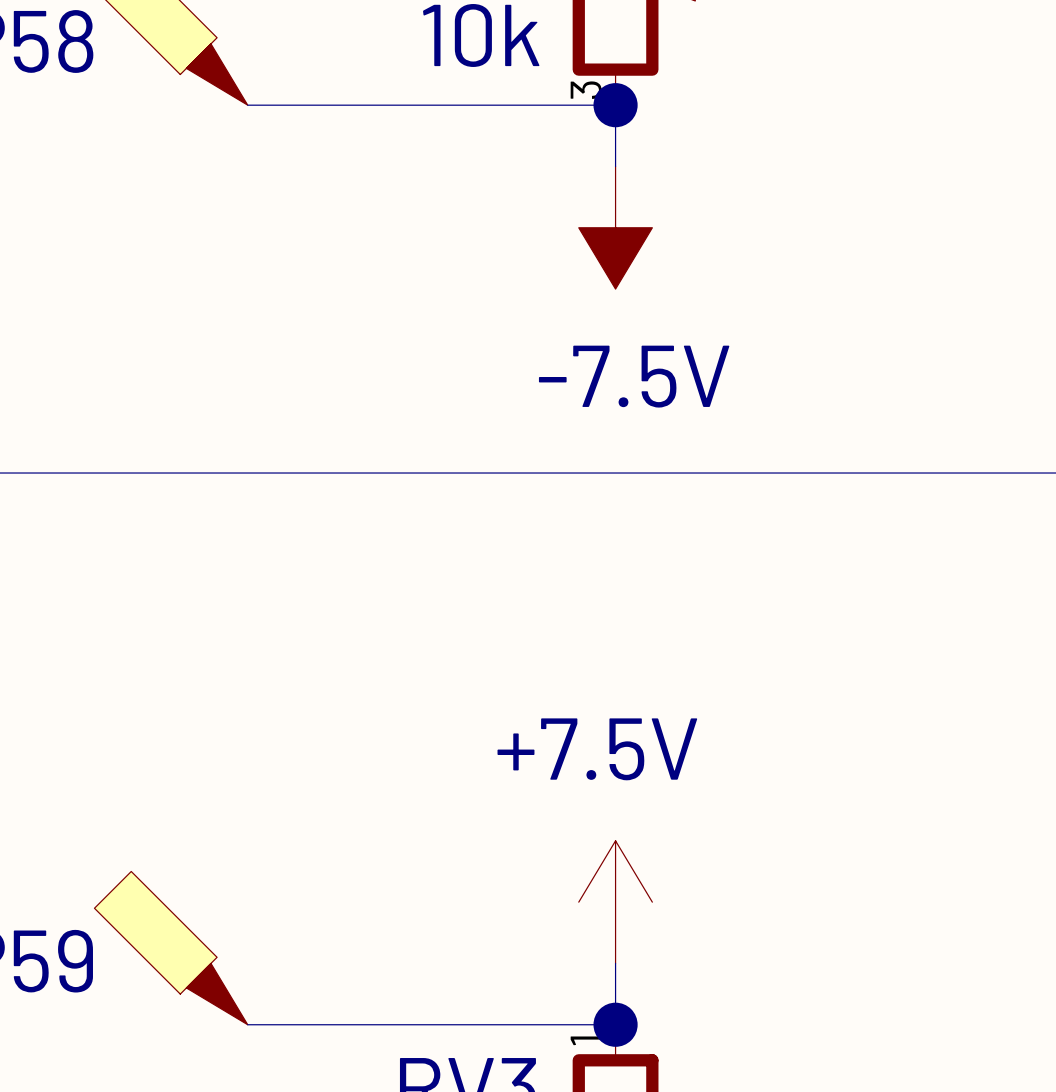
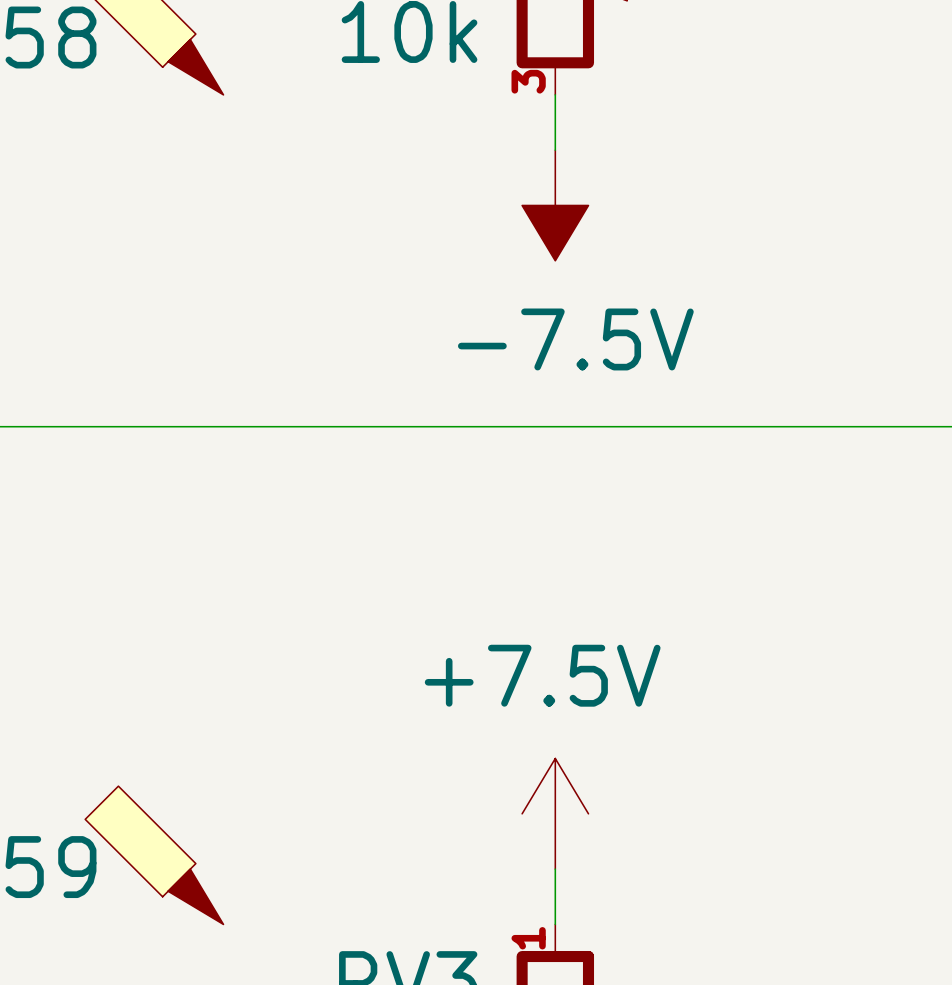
wire: (247, 105) (615, 105) -> none
junction: (615, 105) -> none
wire: (247, 1024) (615, 1024) -> none
junction: (615, 1024) -> none

